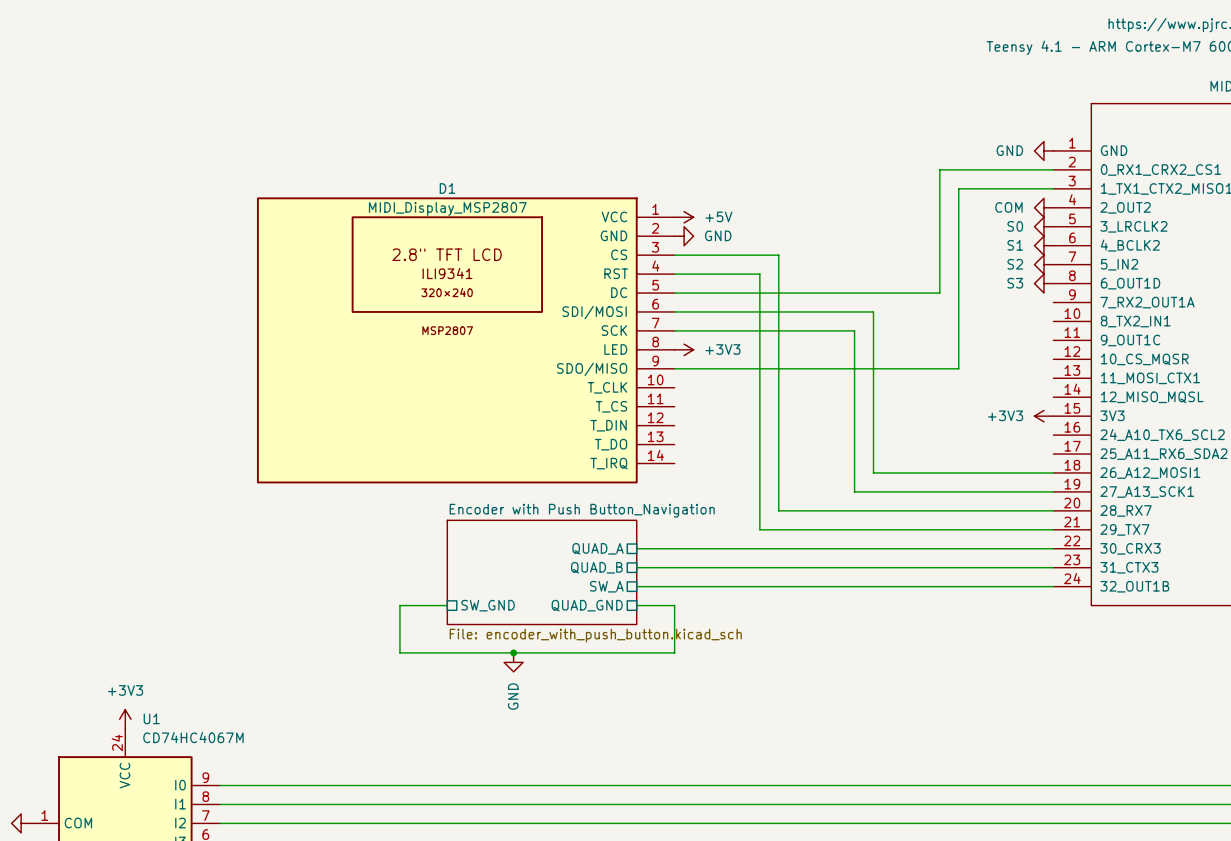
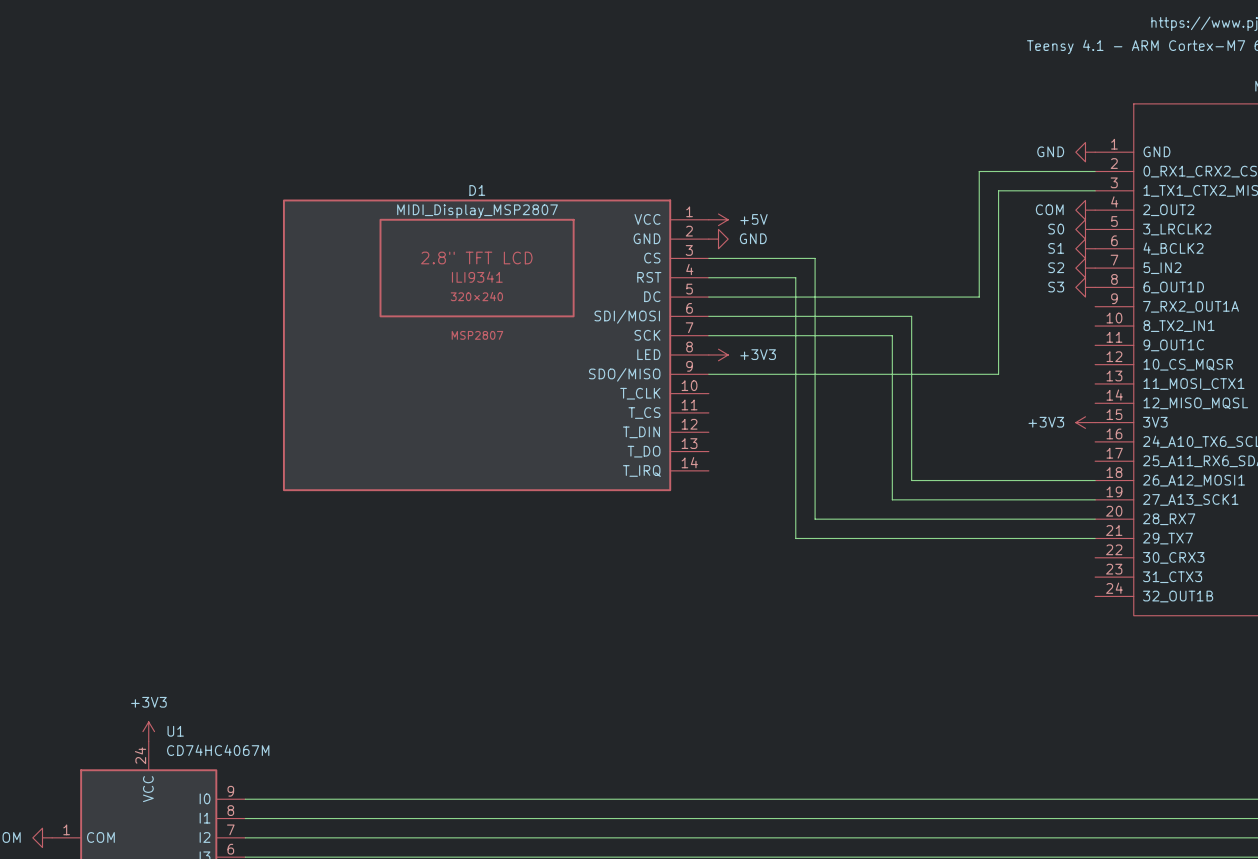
sheet pin: QUAD_A (598, 548) -> none
wire: (636, 548) (1053, 548) -> none
sheet pin: QUAD_B (596, 567) -> none
wire: (636, 567) (1053, 567) -> none
sheet Encoder with Push Button_Navigation: File: encoder_with_push_button.kicad_sch (542, 572) -> none
sheet pin: SW_A (606, 586) -> none
wire: (636, 586) (1053, 586) -> none
wire: (447, 605) (399, 605) (399, 652) (674, 652) (674, 605) (636, 605) -> none
sheet pin: SW_GND (488, 605) -> none
sheet pin: QUAD_GND (587, 605) -> none
junction: (513, 652) -> none
power symbol: GND (513, 662) -> none

